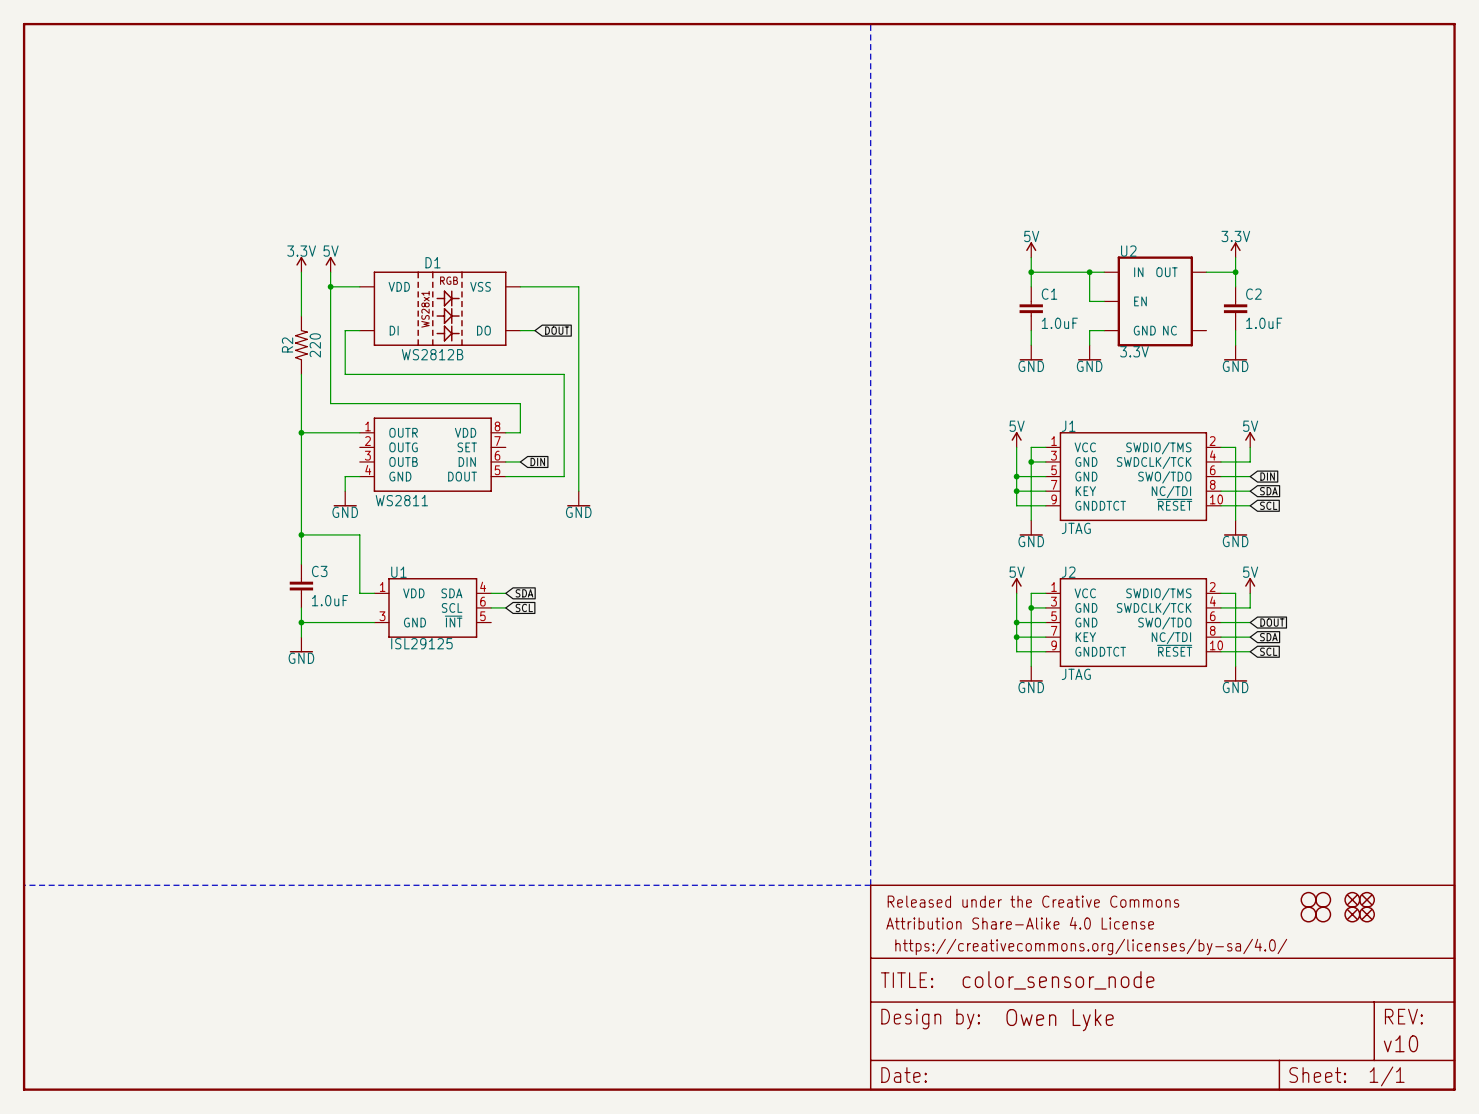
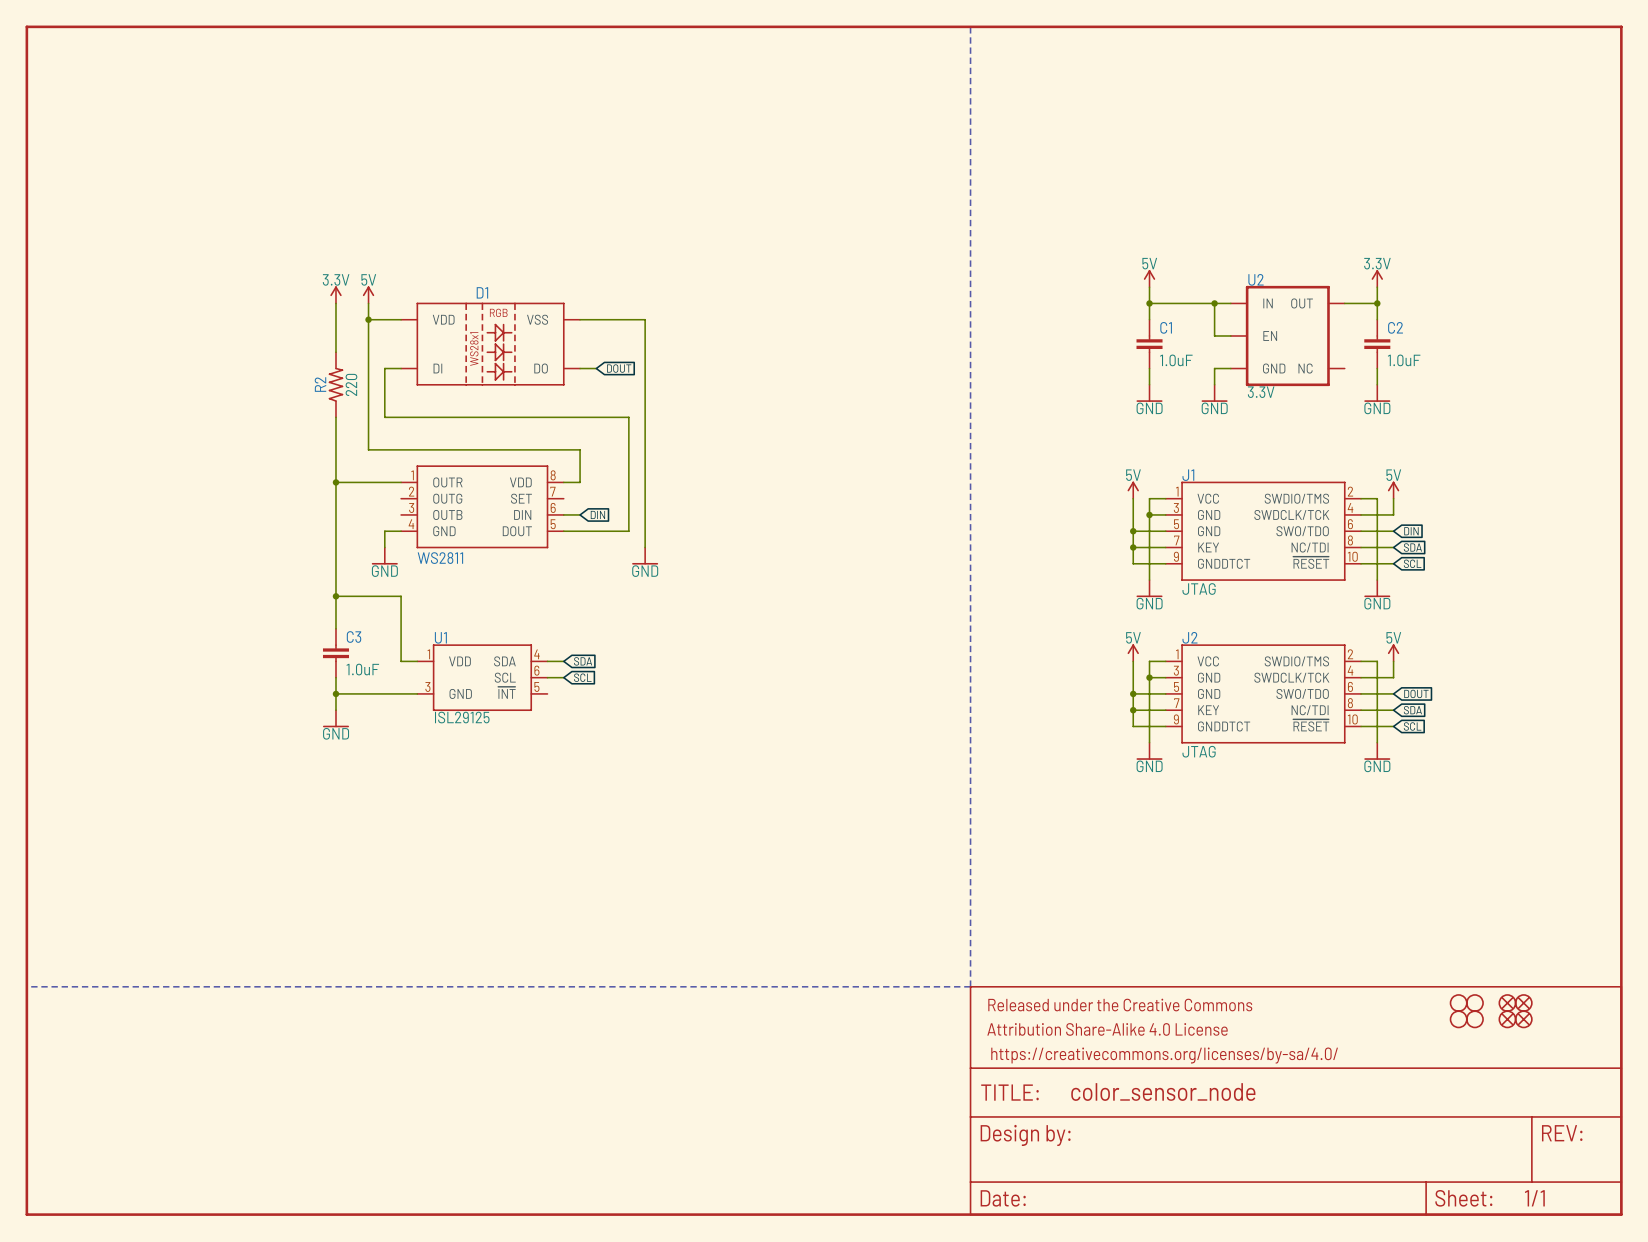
D1 value: WS2812B (432, 354) -> none
part text: Owen Lyke (1060, 1020) -> none
part text: v10 (1400, 1043) -> none

